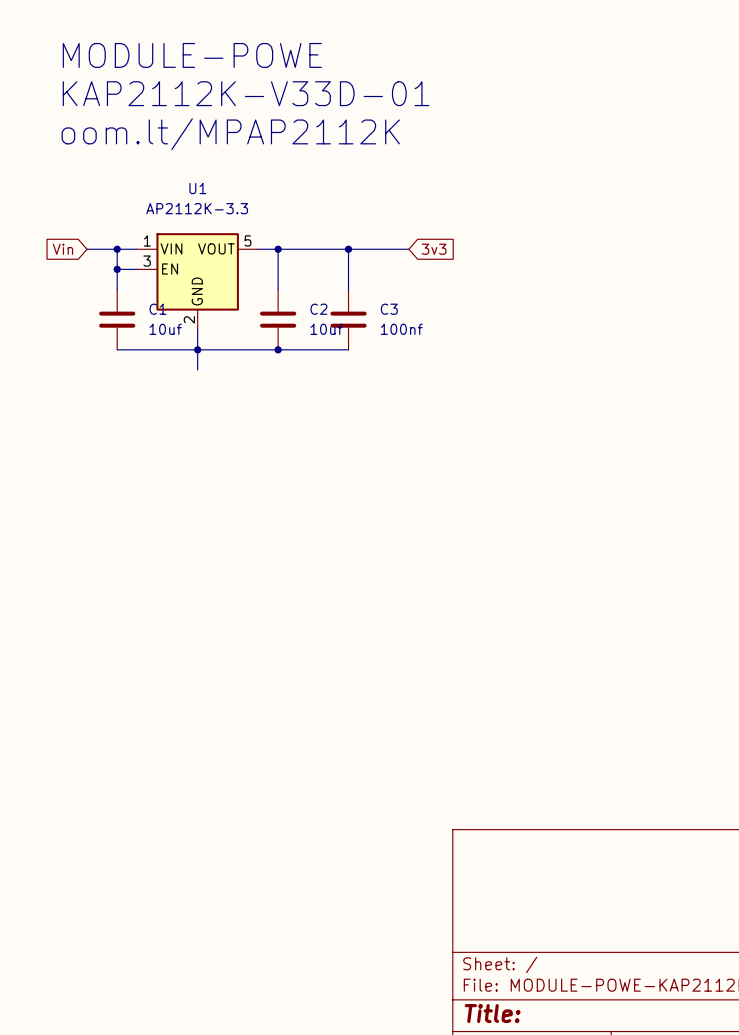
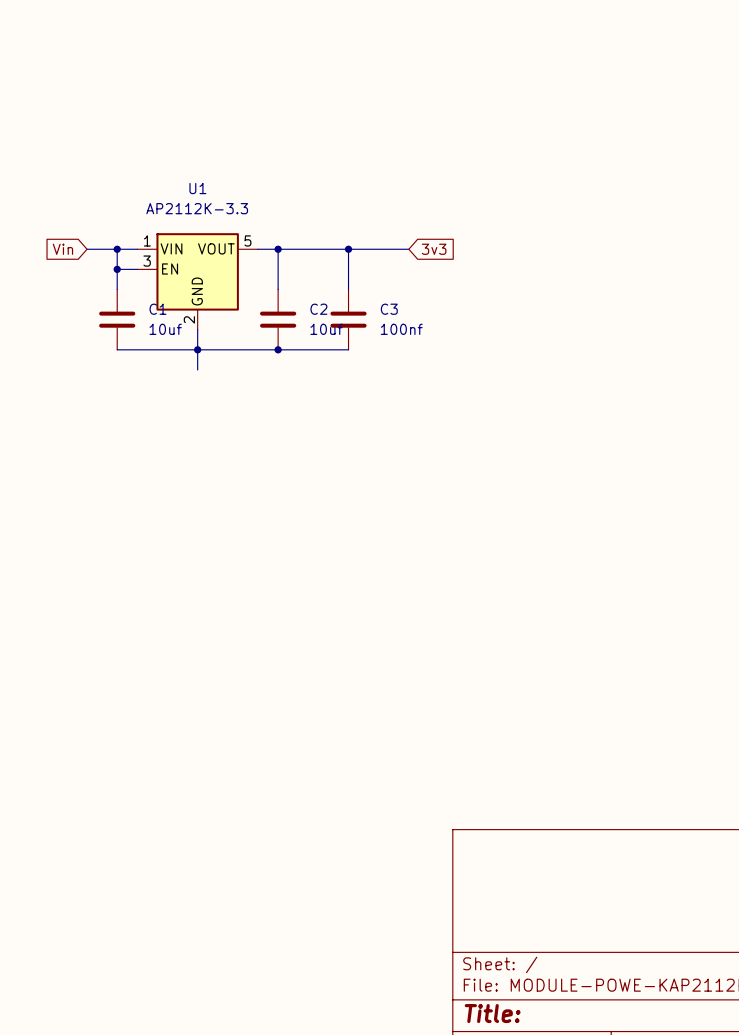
text: MODULE-POWE (192, 55) -> none
text: KAP2112K-V33D-01 (246, 93) -> none
text: oom.lt/MPAP2112K (230, 134) -> none

